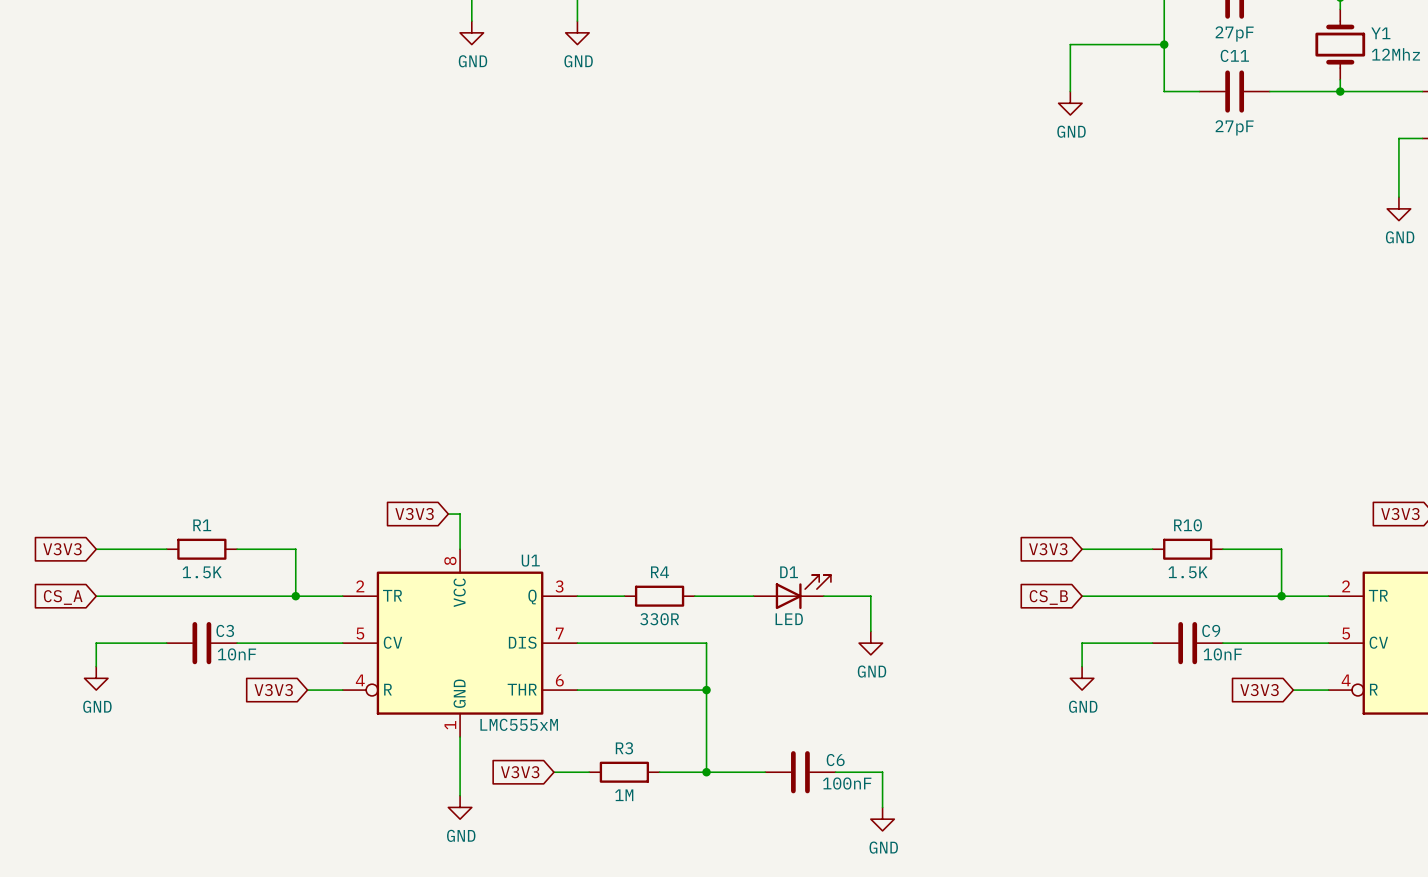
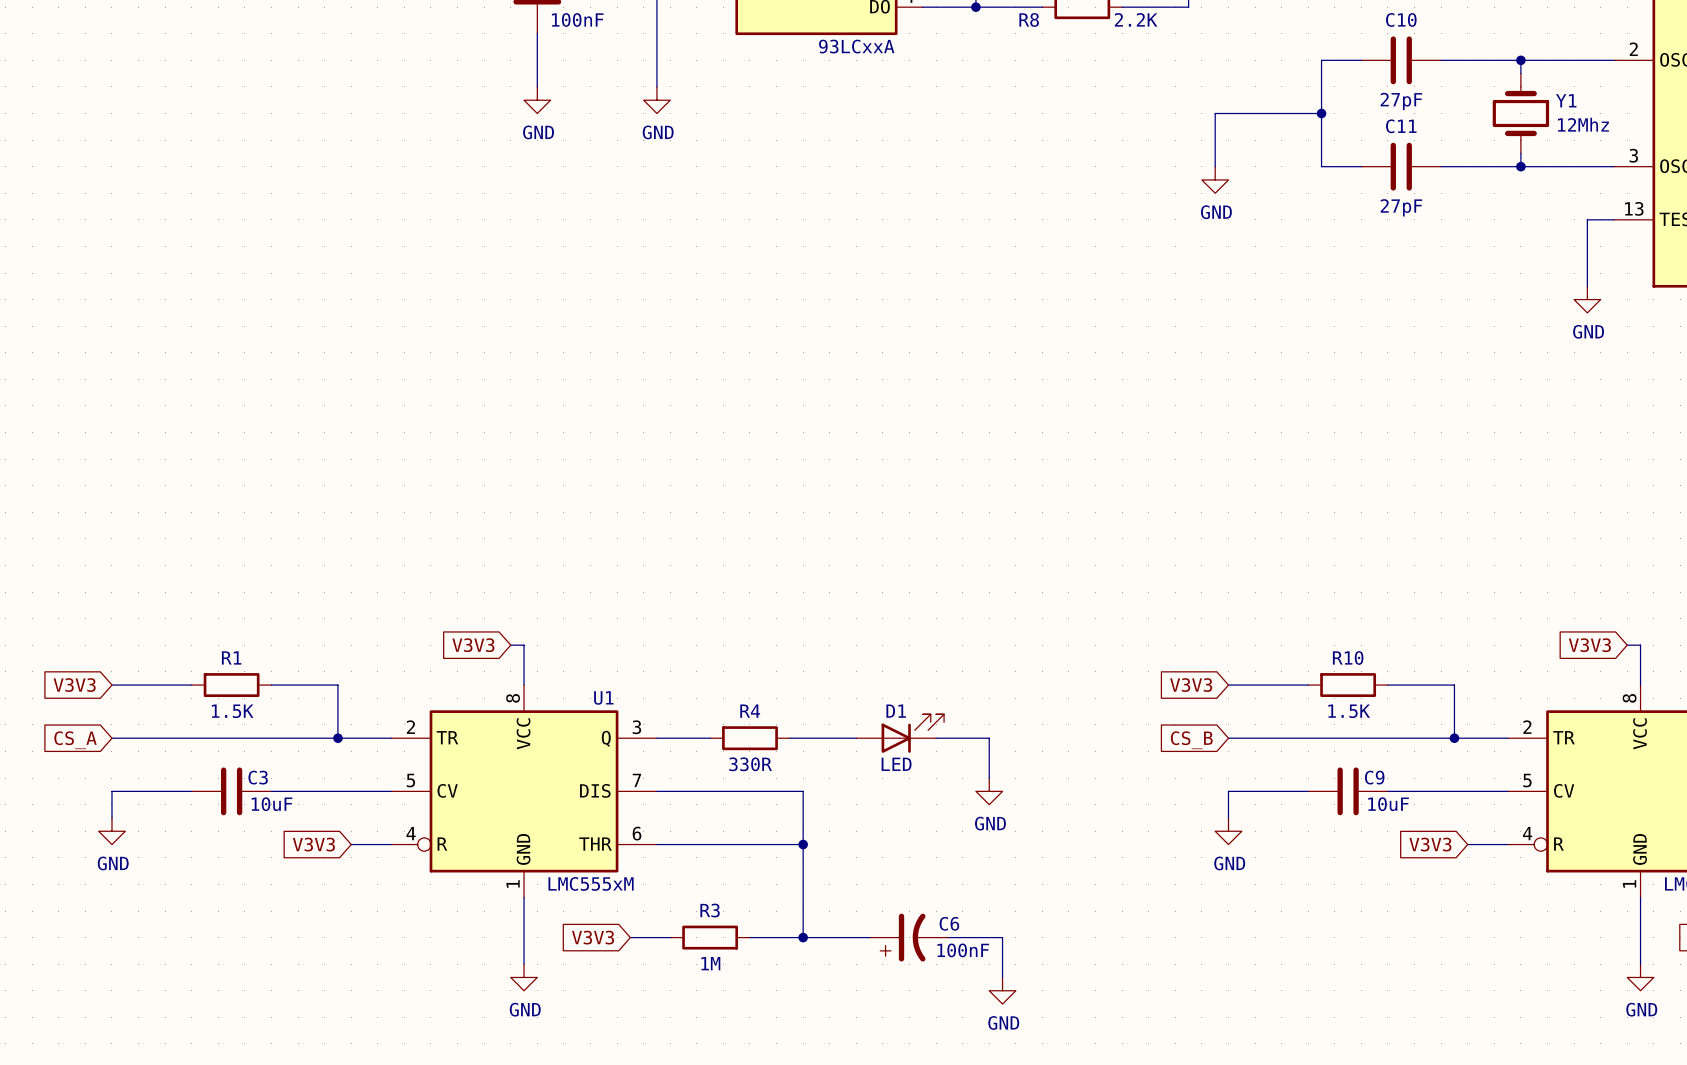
C3 value: 10nF (236, 654) -> 10uF (272, 804)
C9 value: 10nF (1222, 654) -> 10uF (1388, 804)
C6 symbol: [765, 751, 836, 794] -> [869, 913, 950, 962]

